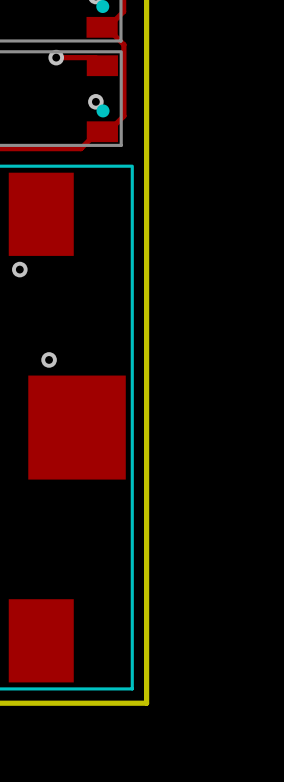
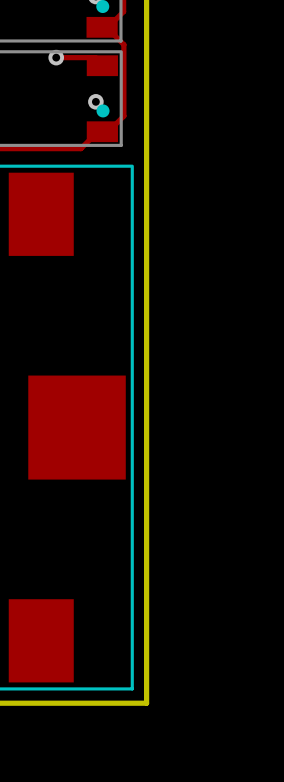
via: (19, 269) -> none
via: (49, 359) -> none

